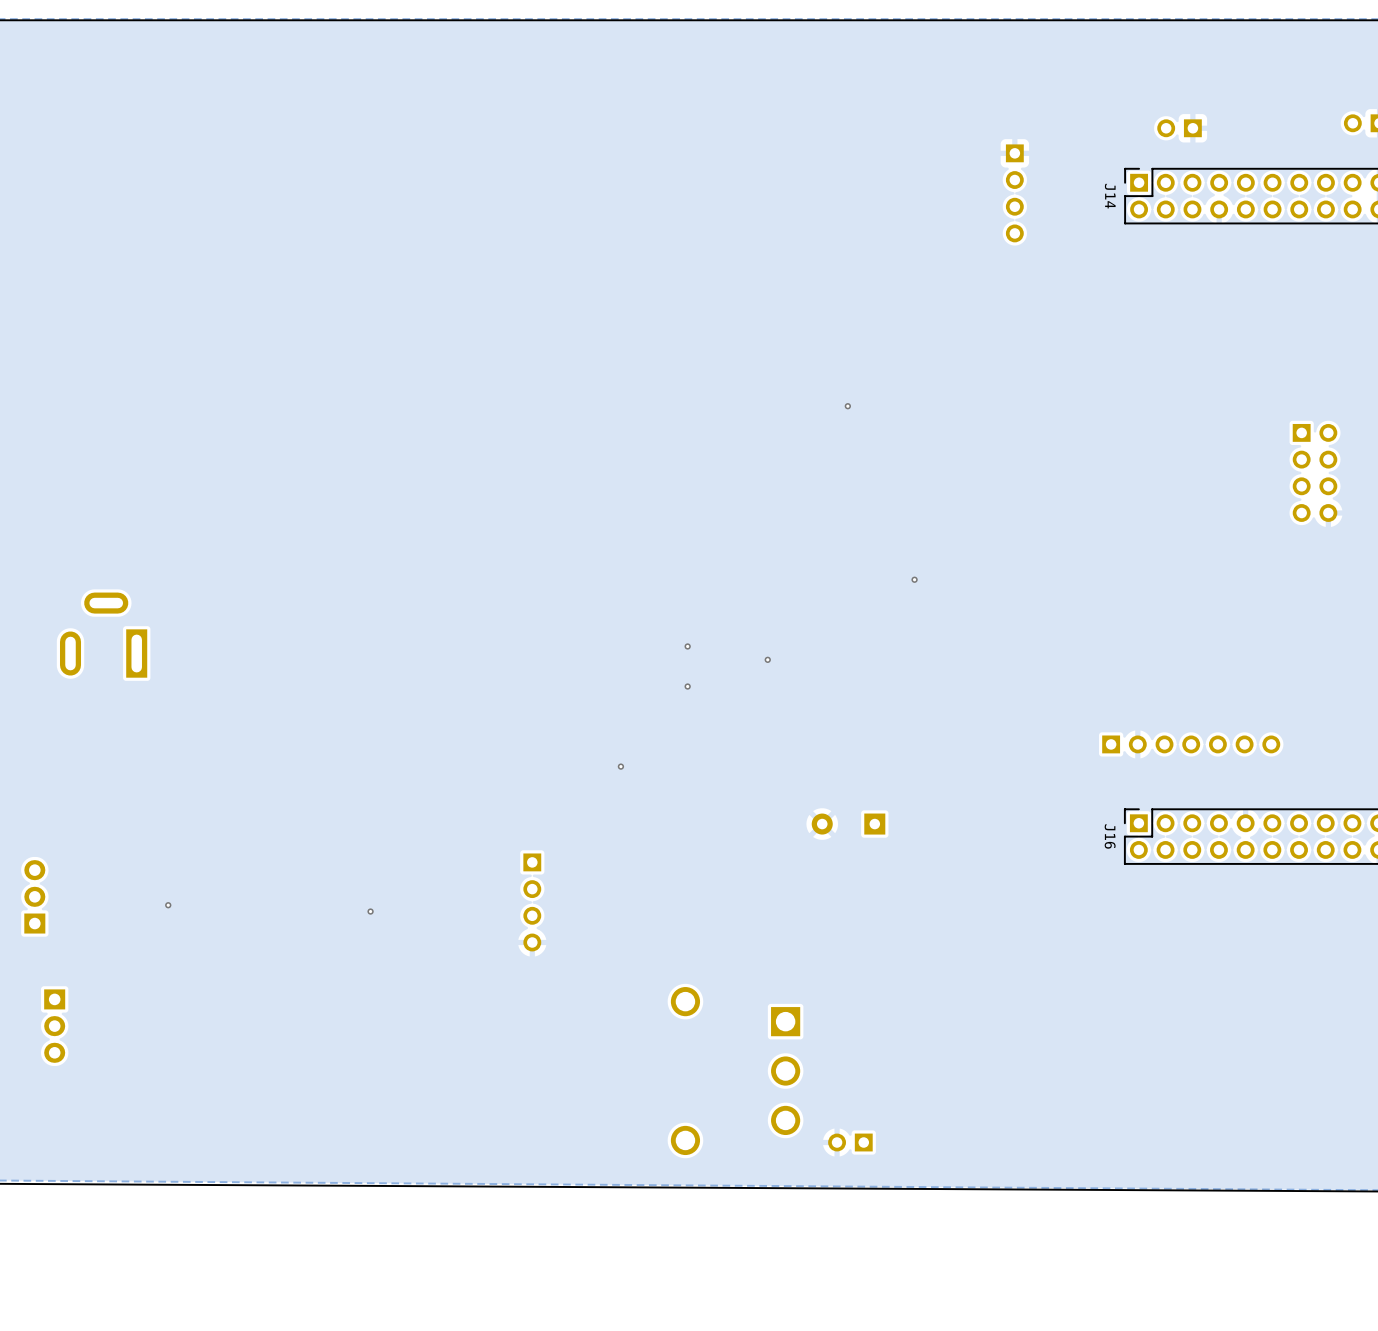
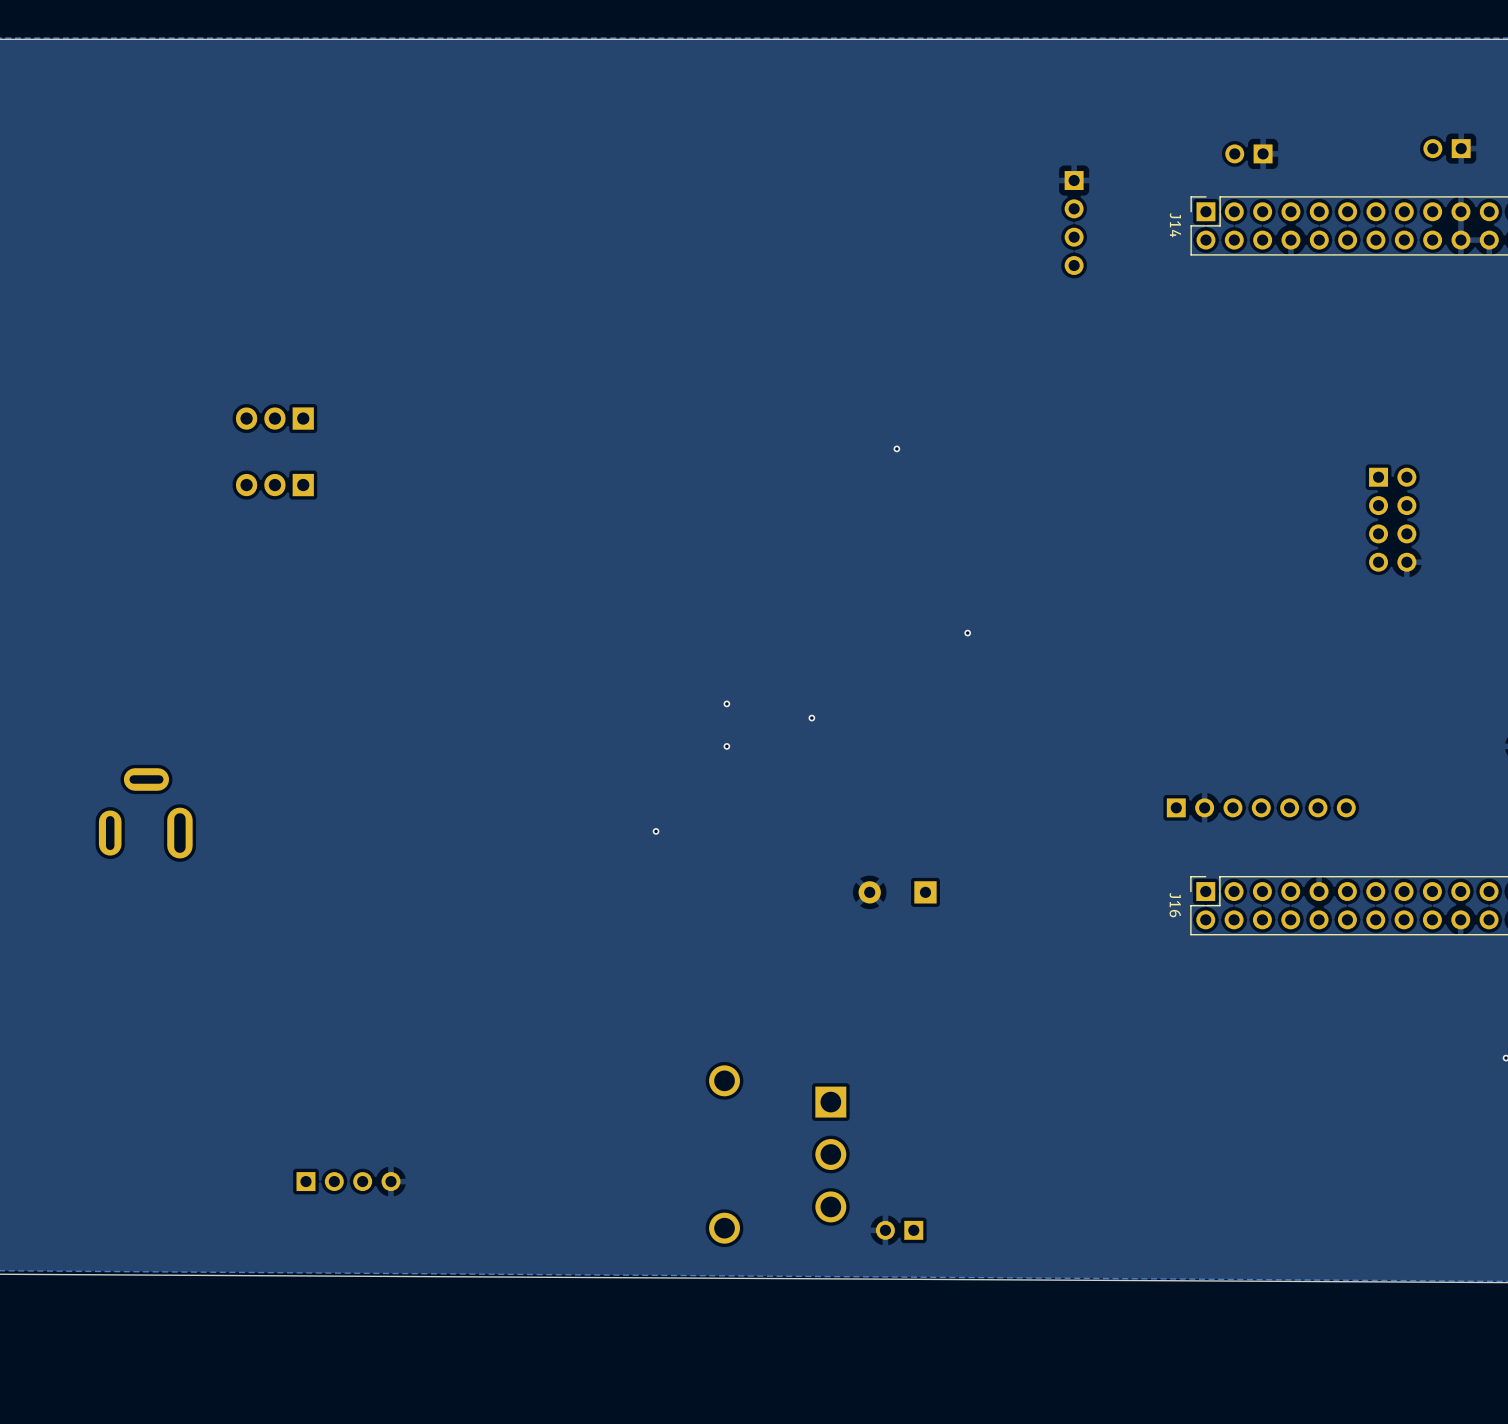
part: none -> (274, 418)
part: none -> (274, 485)
part: (103, 635) -> none
part: none -> (145, 813)
part: (34, 896) -> none
part: (532, 902) -> none
via: (168, 905) -> none
via: (370, 911) -> none
part: (54, 1026) -> none
part: none -> (348, 1181)

